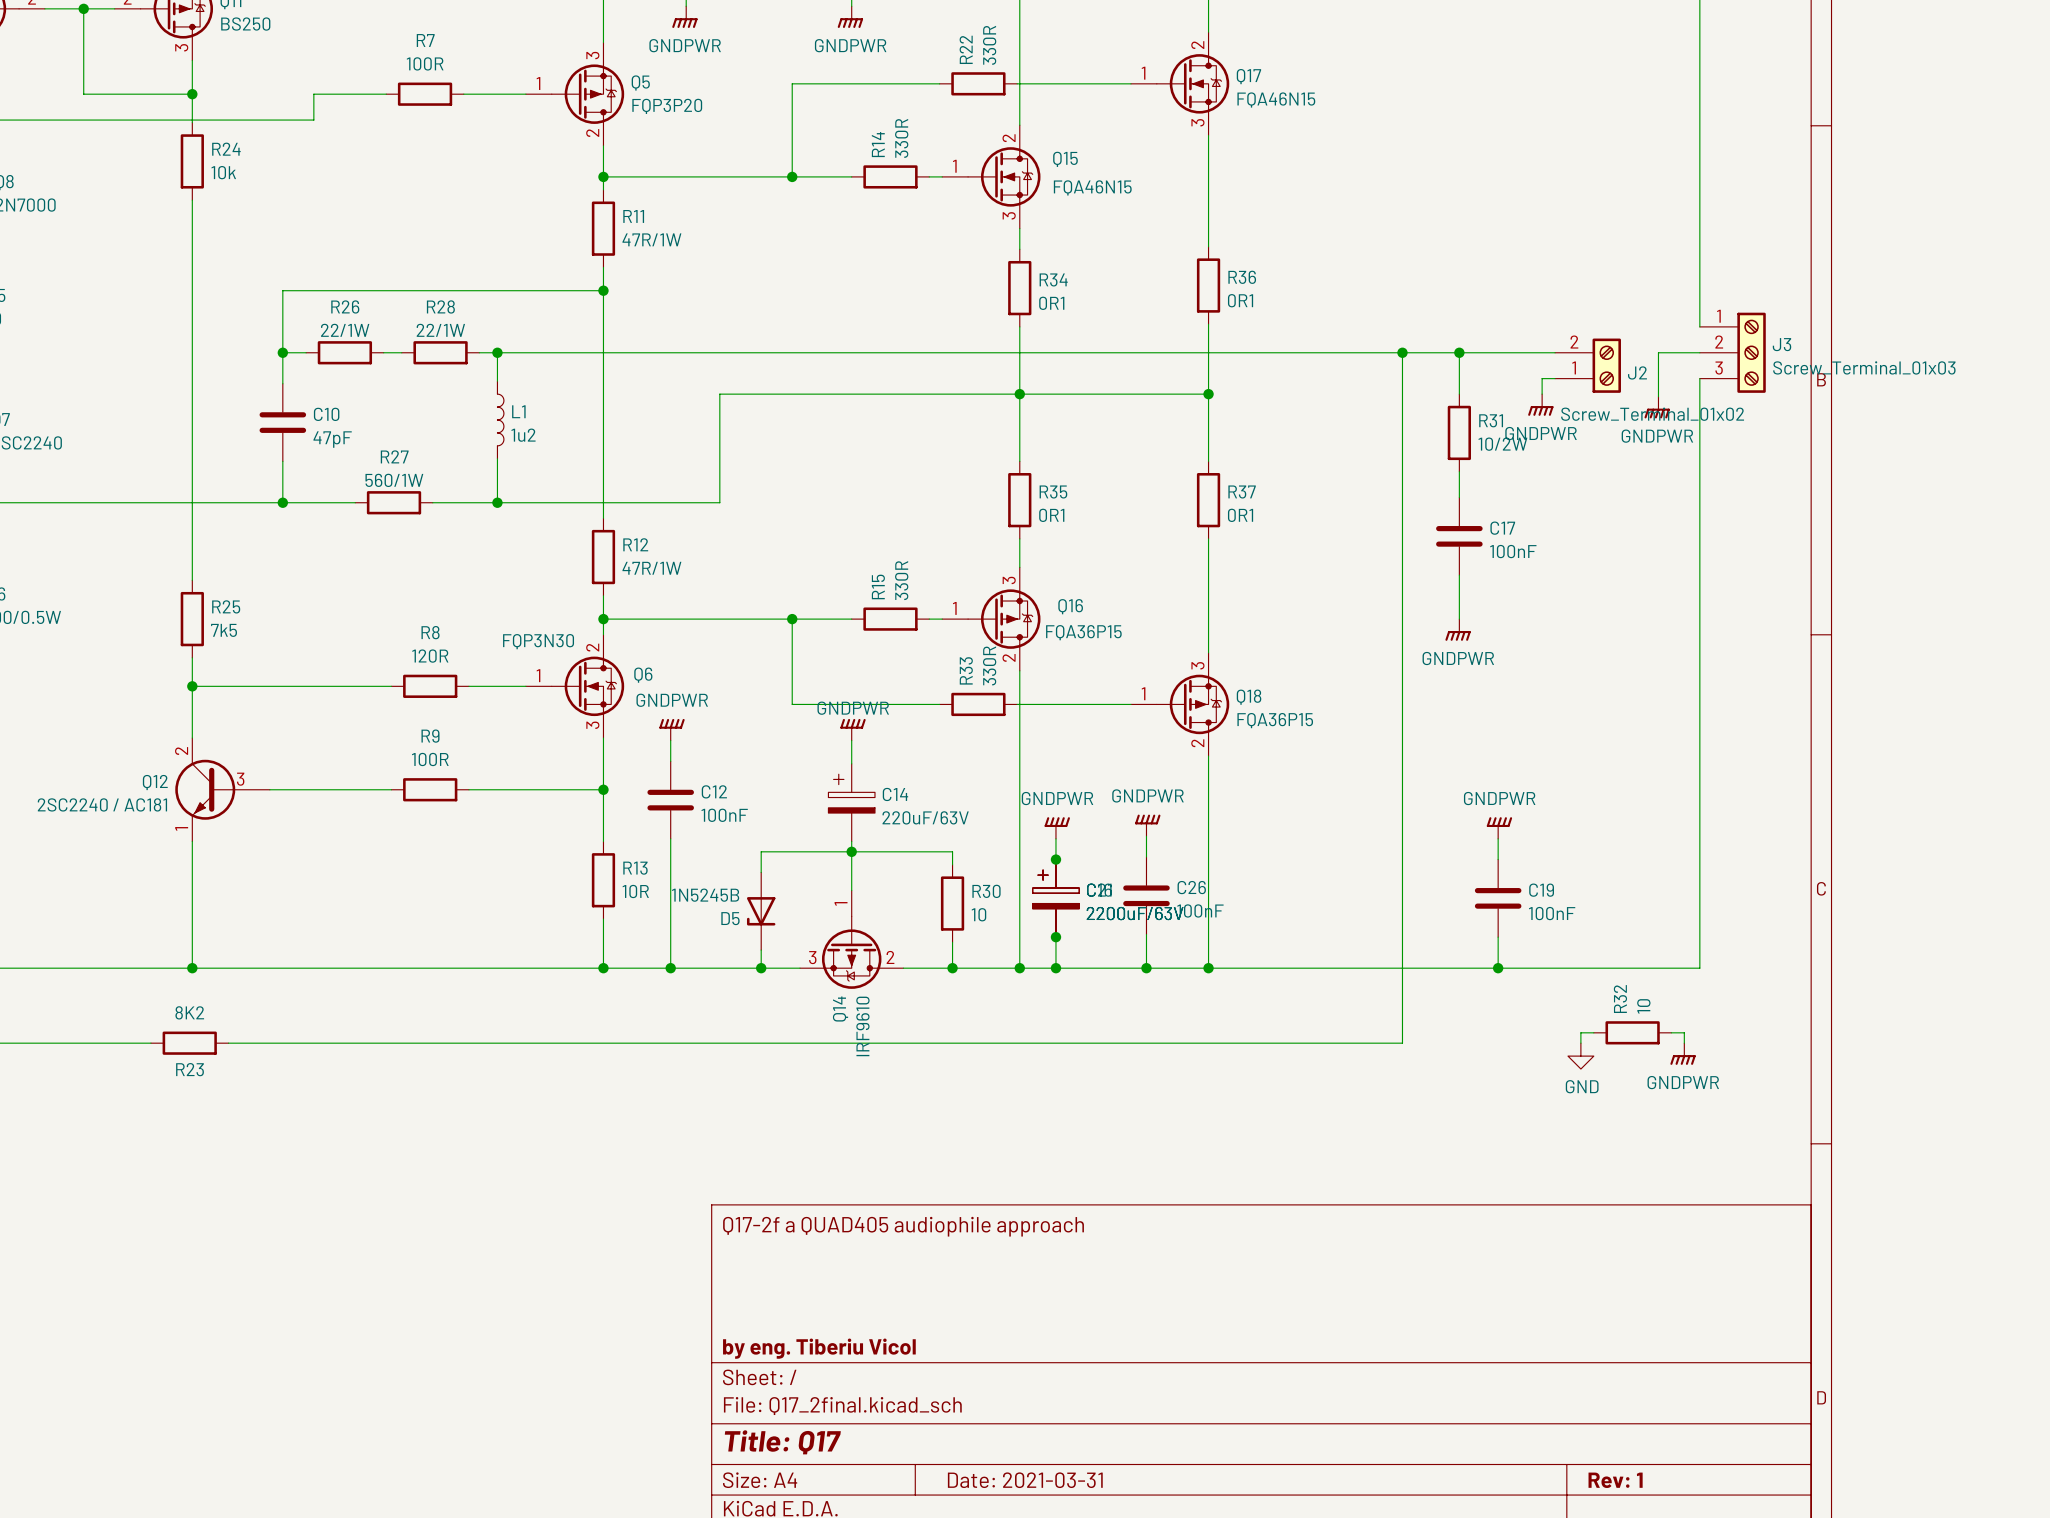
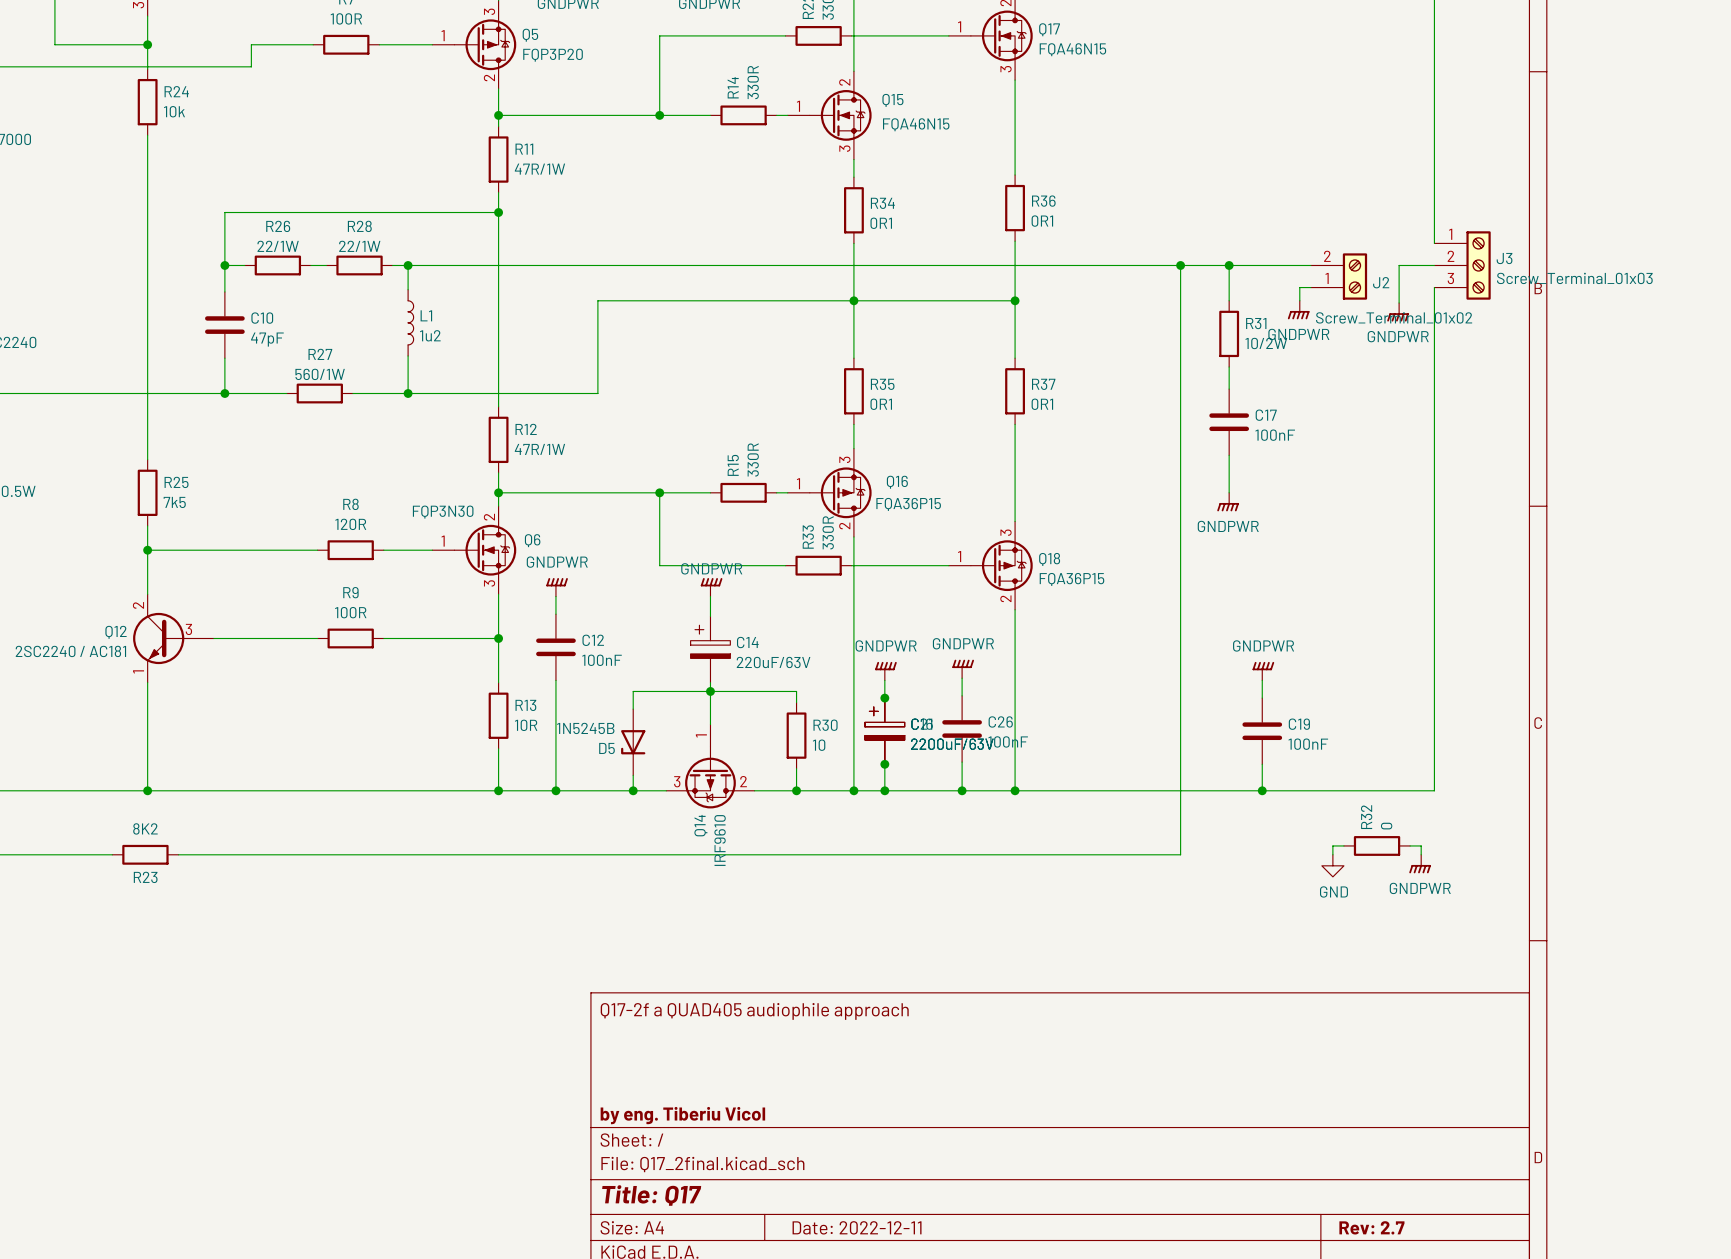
R32 value: 10 (1643, 1006) -> 0 (1386, 826)
title block: Date: 2021-03-31 (1025, 1480) -> Date: 2022-12-11 (857, 1227)
title block: Rev: 1 (1615, 1480) -> Rev: 2.7 (1371, 1227)

